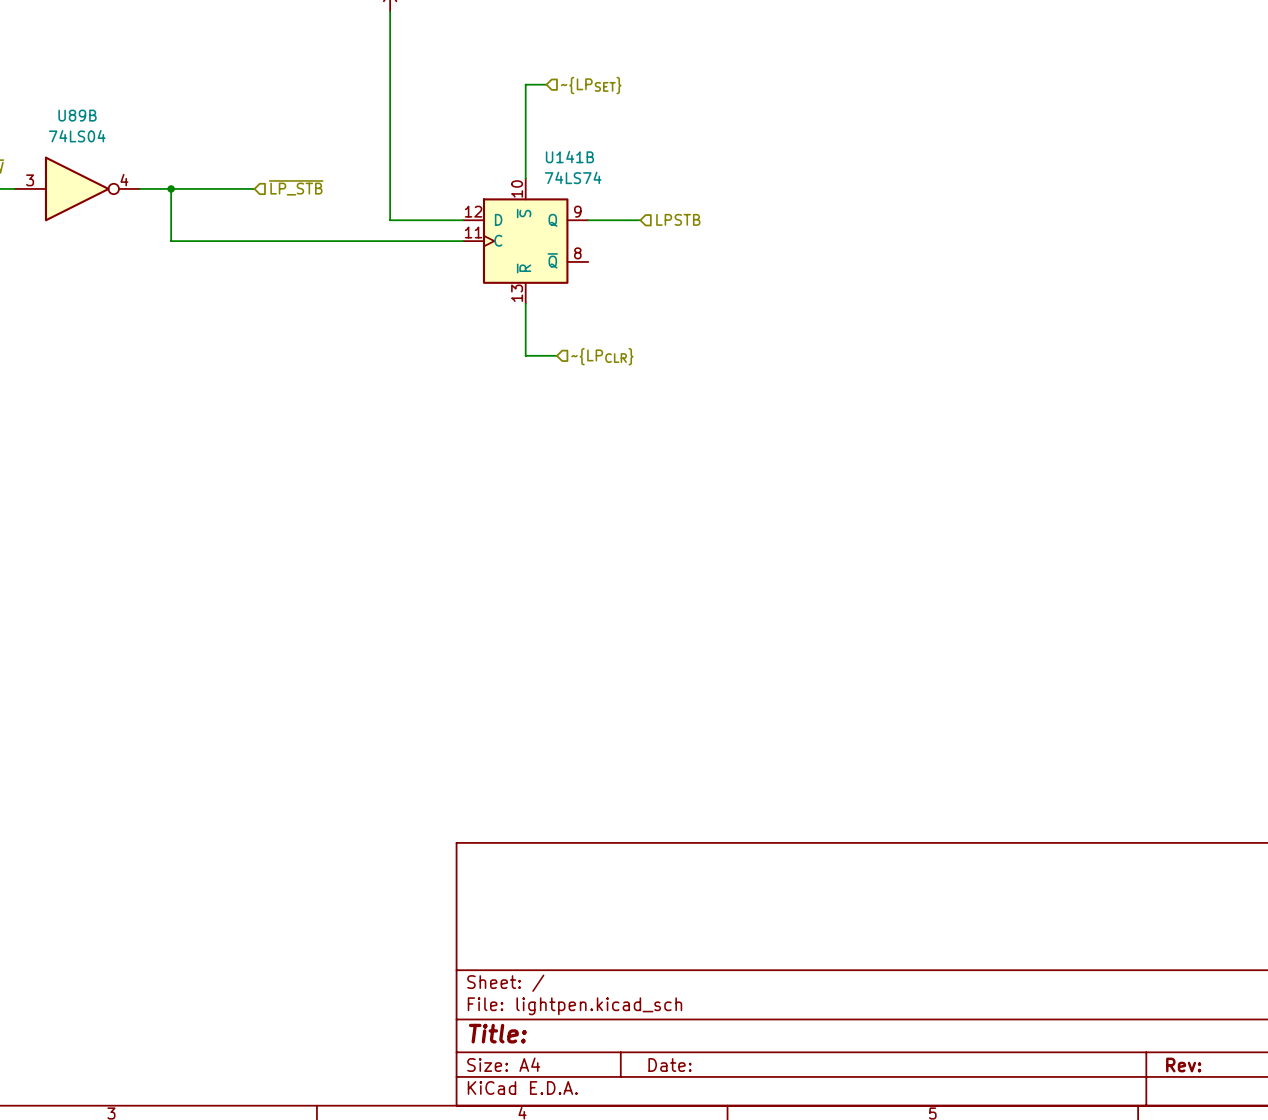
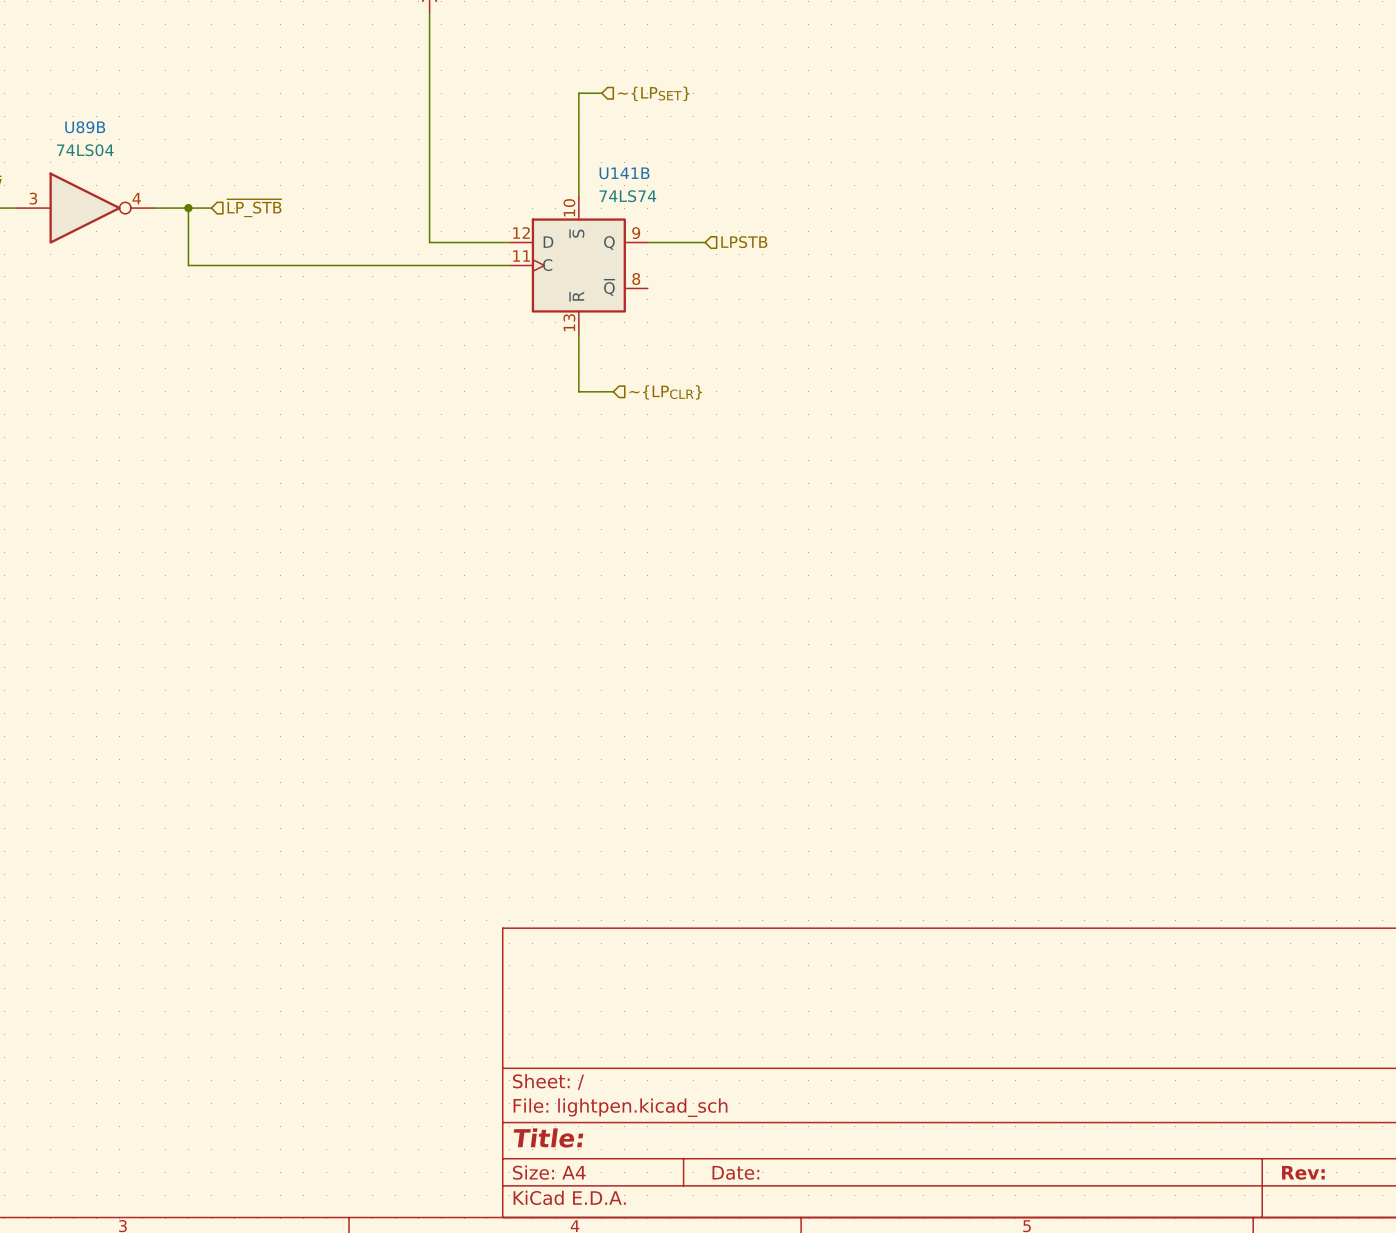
hierarchical label position: ~{LP_STB} (296, 187) -> ~{LP_STB} (254, 208)
wire: (191, 188) (254, 188) -> none

